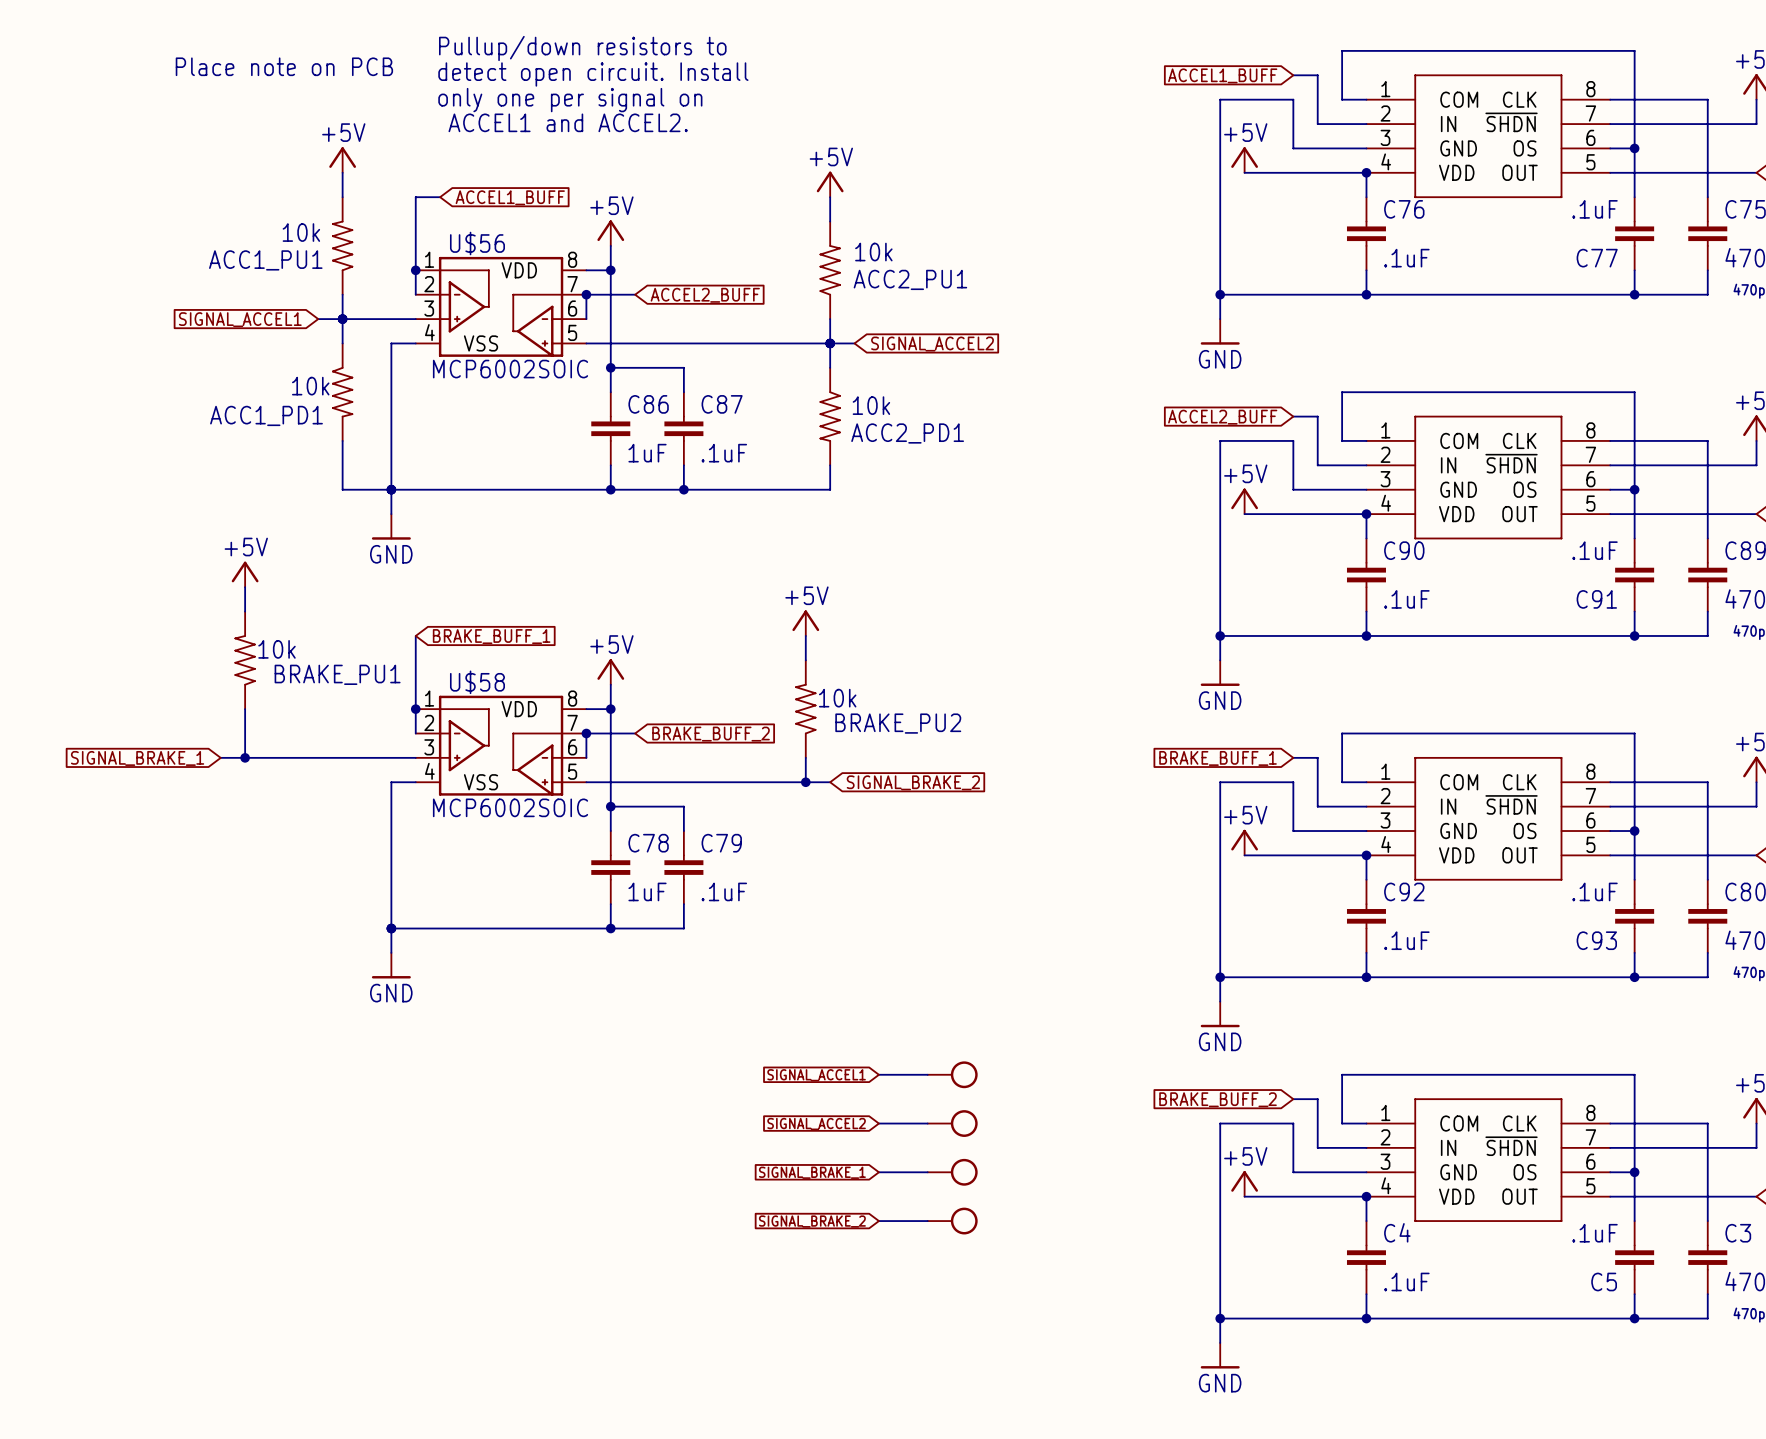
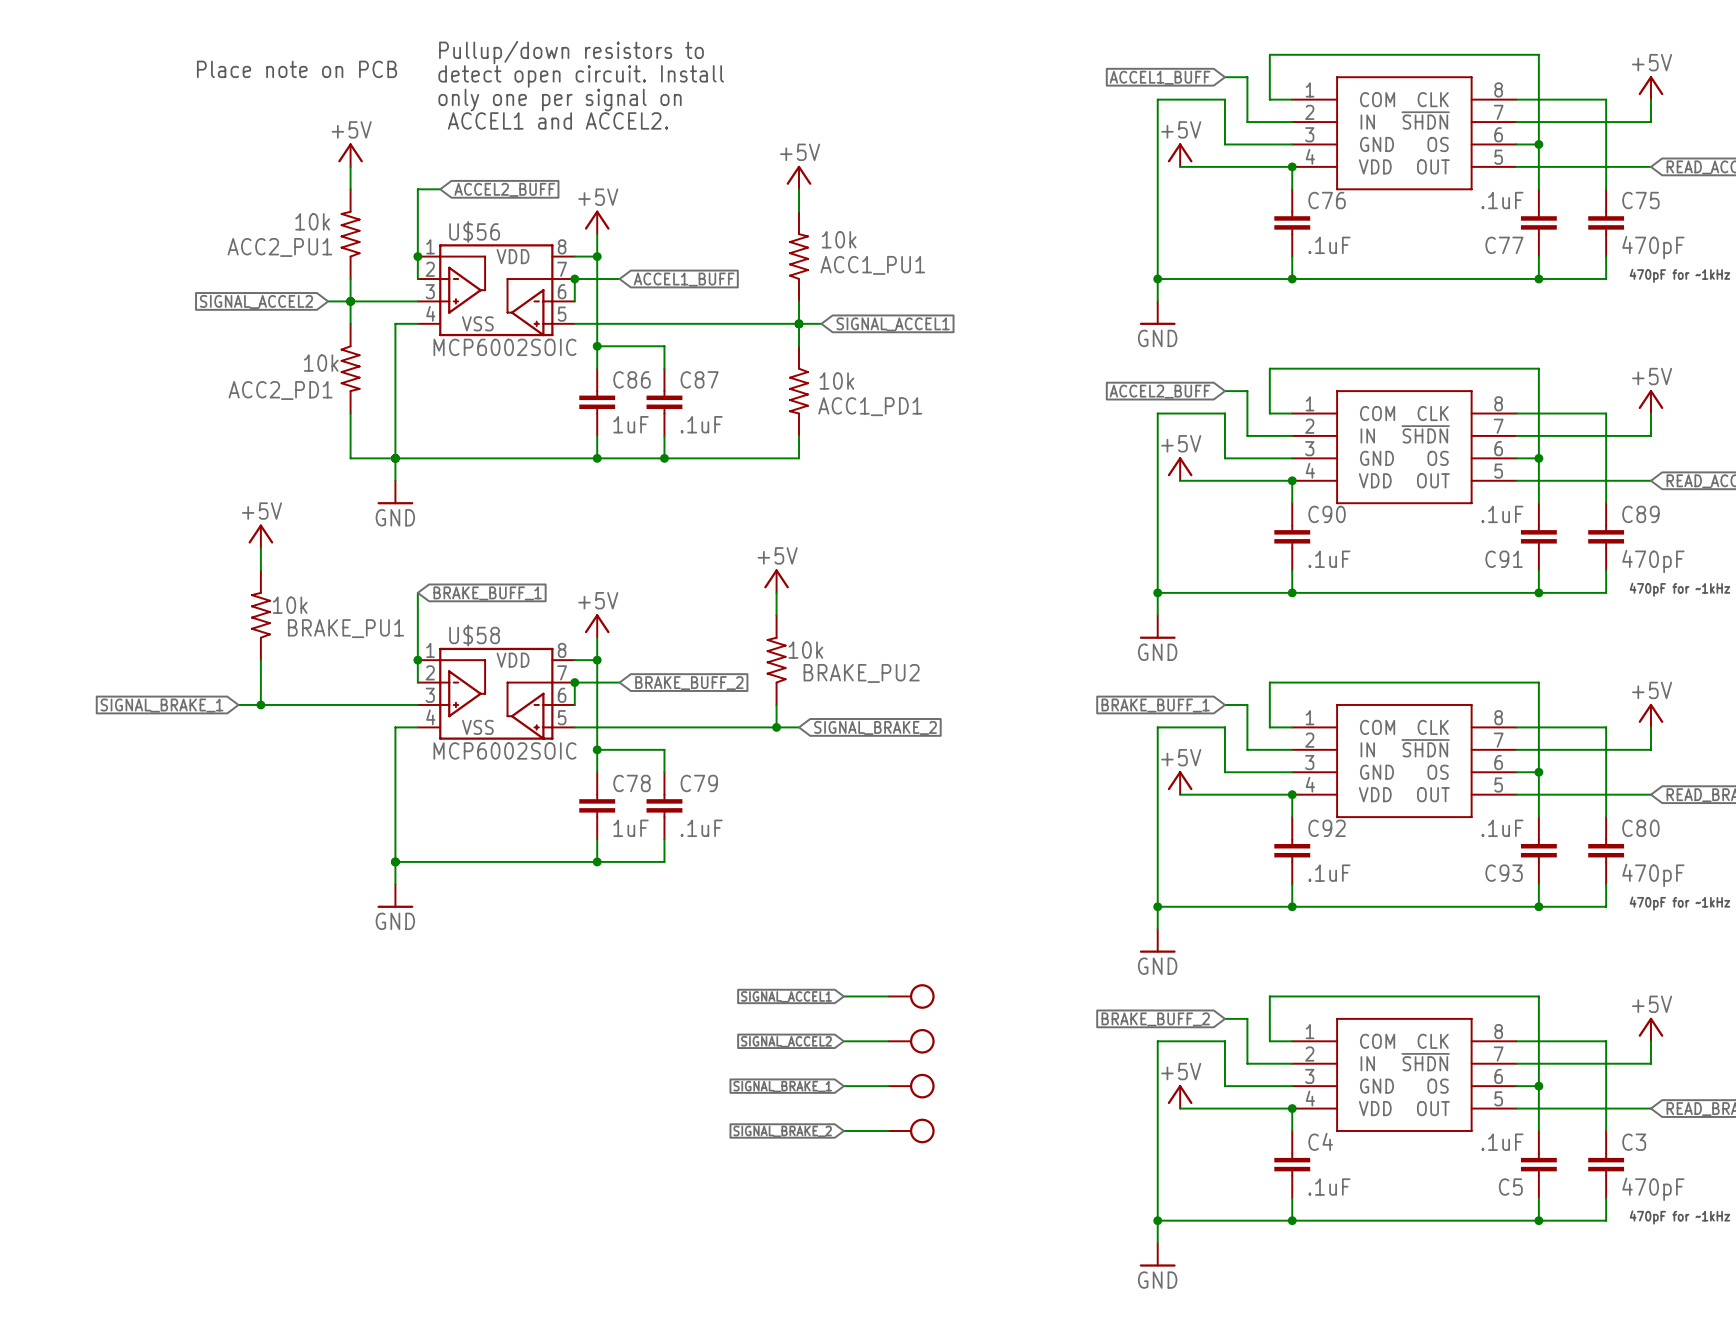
global label: ACCEL1_BUFF (510, 197) -> ACCEL2_BUFF (504, 189)
ACC1_PU1 name: ACC1_PU1 (265, 260) -> ACC2_PU1 (279, 247)
ACC2_PU1 name: ACC2_PU1 (910, 279) -> ACC1_PU1 (872, 265)
global label: ACCEL2_BUFF (705, 295) -> ACCEL1_BUFF (684, 279)
global label: SIGNAL_ACCEL1 (240, 319) -> SIGNAL_ACCEL2 (256, 301)
global label: SIGNAL_ACCEL2 (932, 344) -> SIGNAL_ACCEL1 (893, 324)
ACC1_PD1 name: ACC1_PD1 (266, 415) -> ACC2_PD1 (280, 390)
ACC2_PD1 name: ACC2_PD1 (907, 433) -> ACC1_PD1 (870, 406)

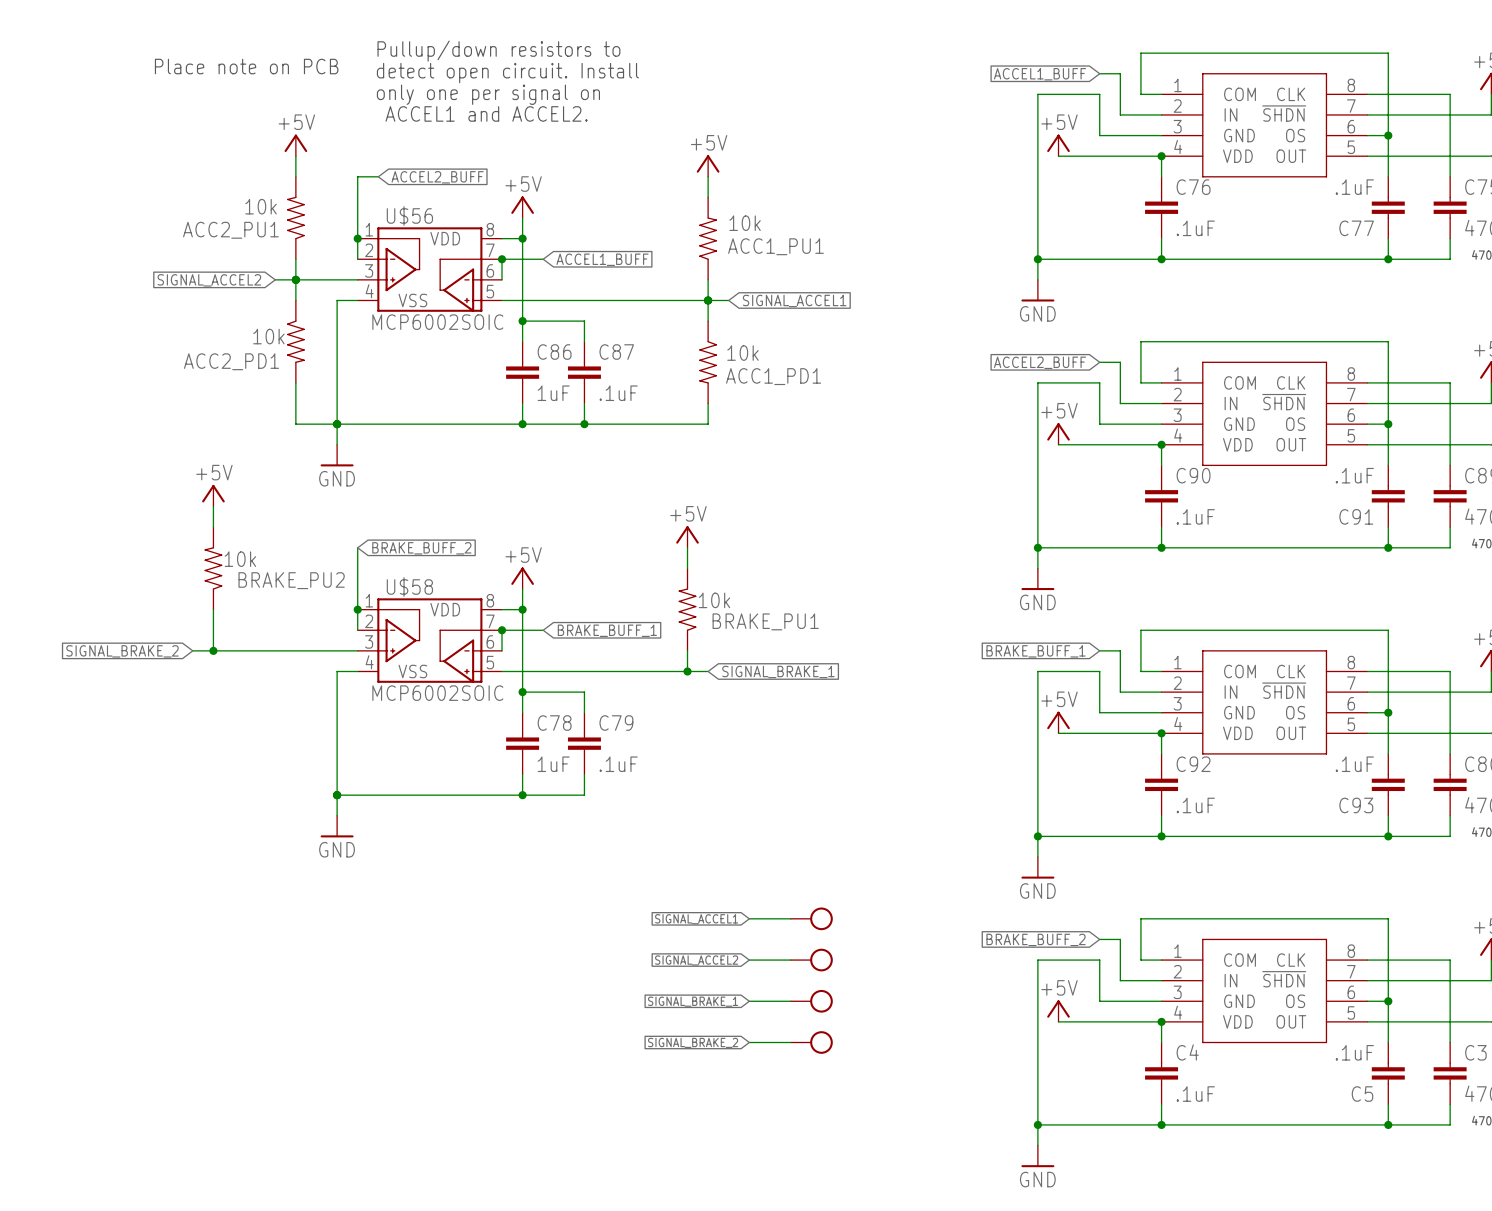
global label: BRAKE_BUFF_1 (487, 593) -> BRAKE_BUFF_2 (421, 548)
BRAKE_PU1 name: BRAKE_PU1 (345, 628) -> BRAKE_PU2 (291, 580)
BRAKE_PU2 name: BRAKE_PU2 (861, 673) -> BRAKE_PU1 (765, 621)
global label: BRAKE_BUFF_2 (689, 683) -> BRAKE_BUFF_1 (607, 630)
global label: SIGNAL_BRAKE_1 (161, 705) -> SIGNAL_BRAKE_2 (122, 651)
global label: SIGNAL_BRAKE_2 (875, 727) -> SIGNAL_BRAKE_1 (778, 671)

